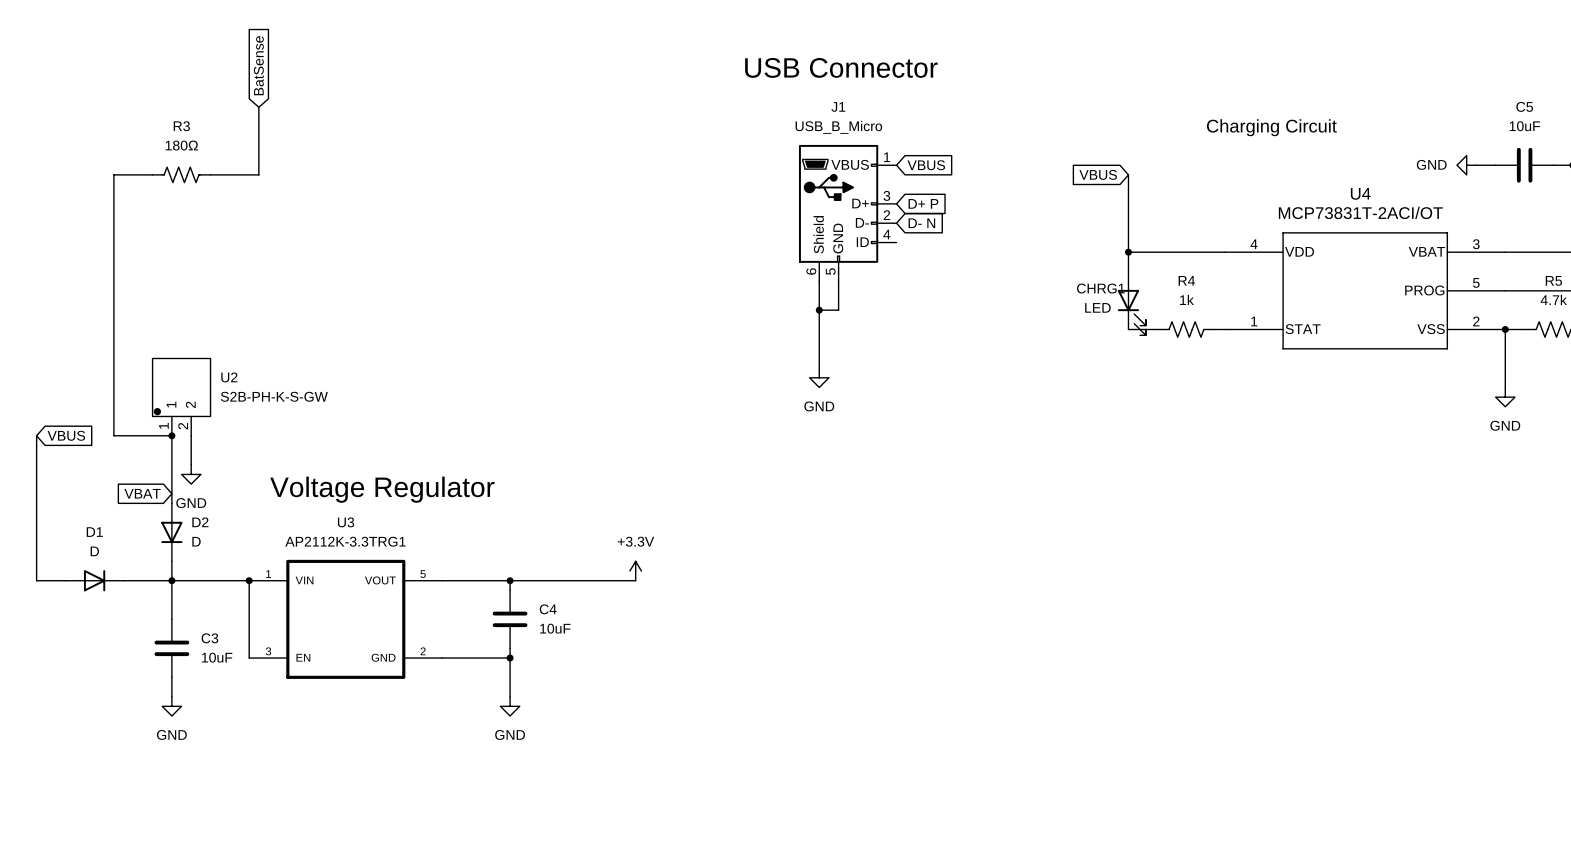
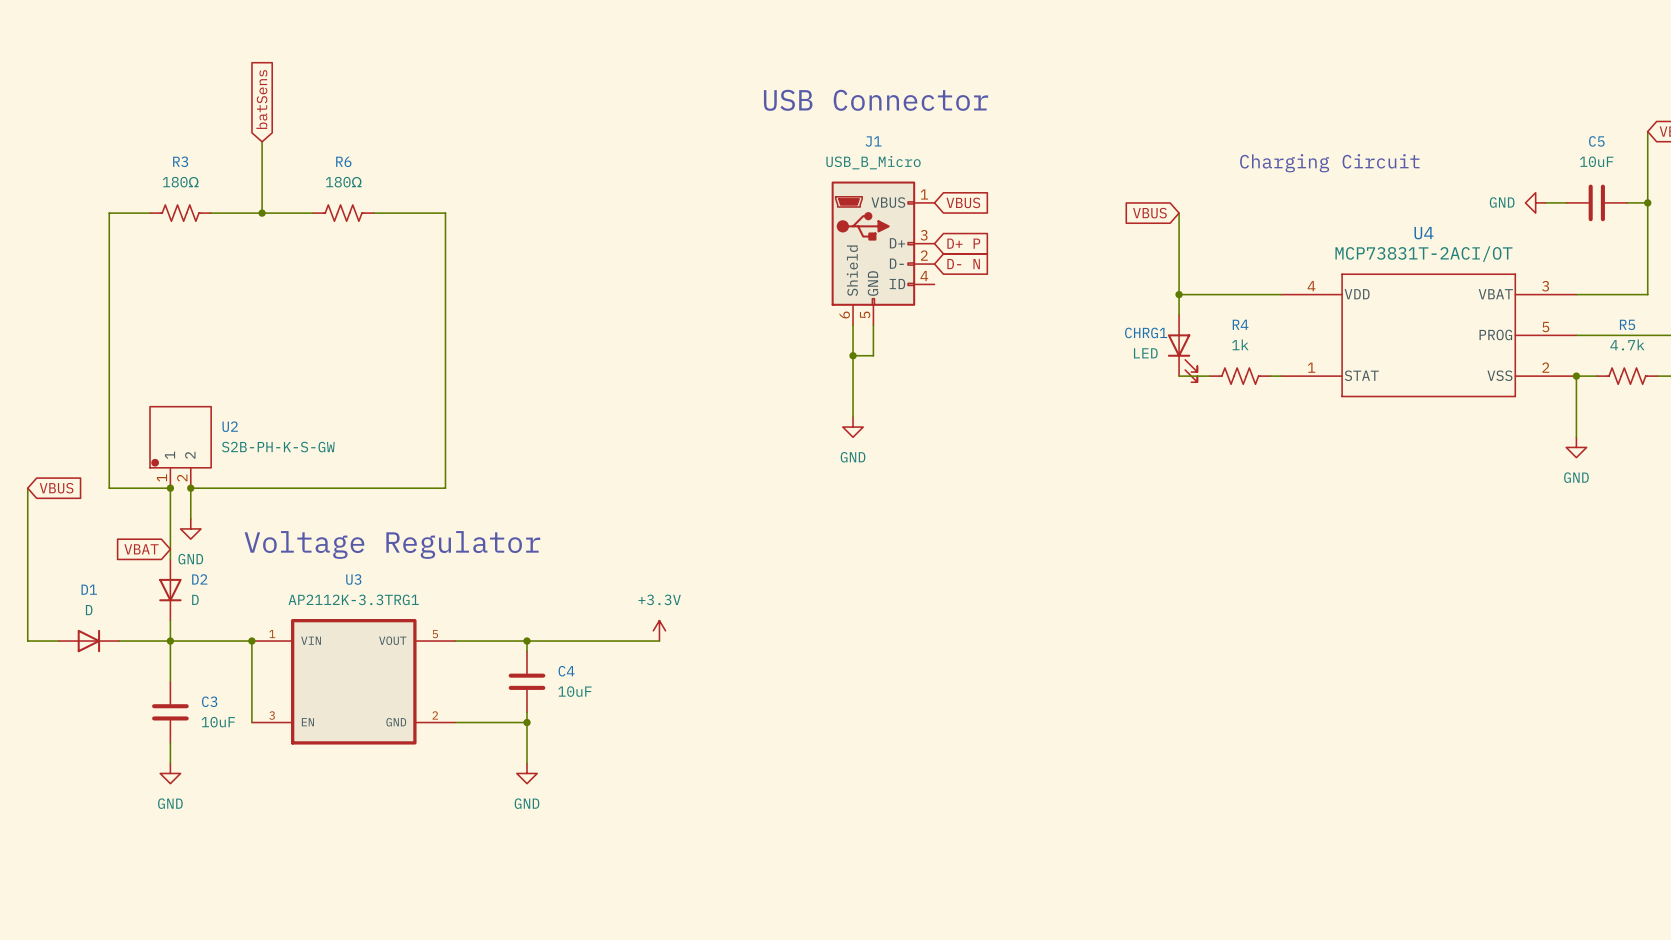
global label: BatSense (258, 65) -> batSens (261, 99)
wire: none -> (262, 213) (313, 213)
junction: none -> (262, 213)
R6: none -> 180Ω (343, 213)
wire: none -> (374, 213) (445, 213) (445, 488) (190, 488)
junction: none -> (190, 488)

